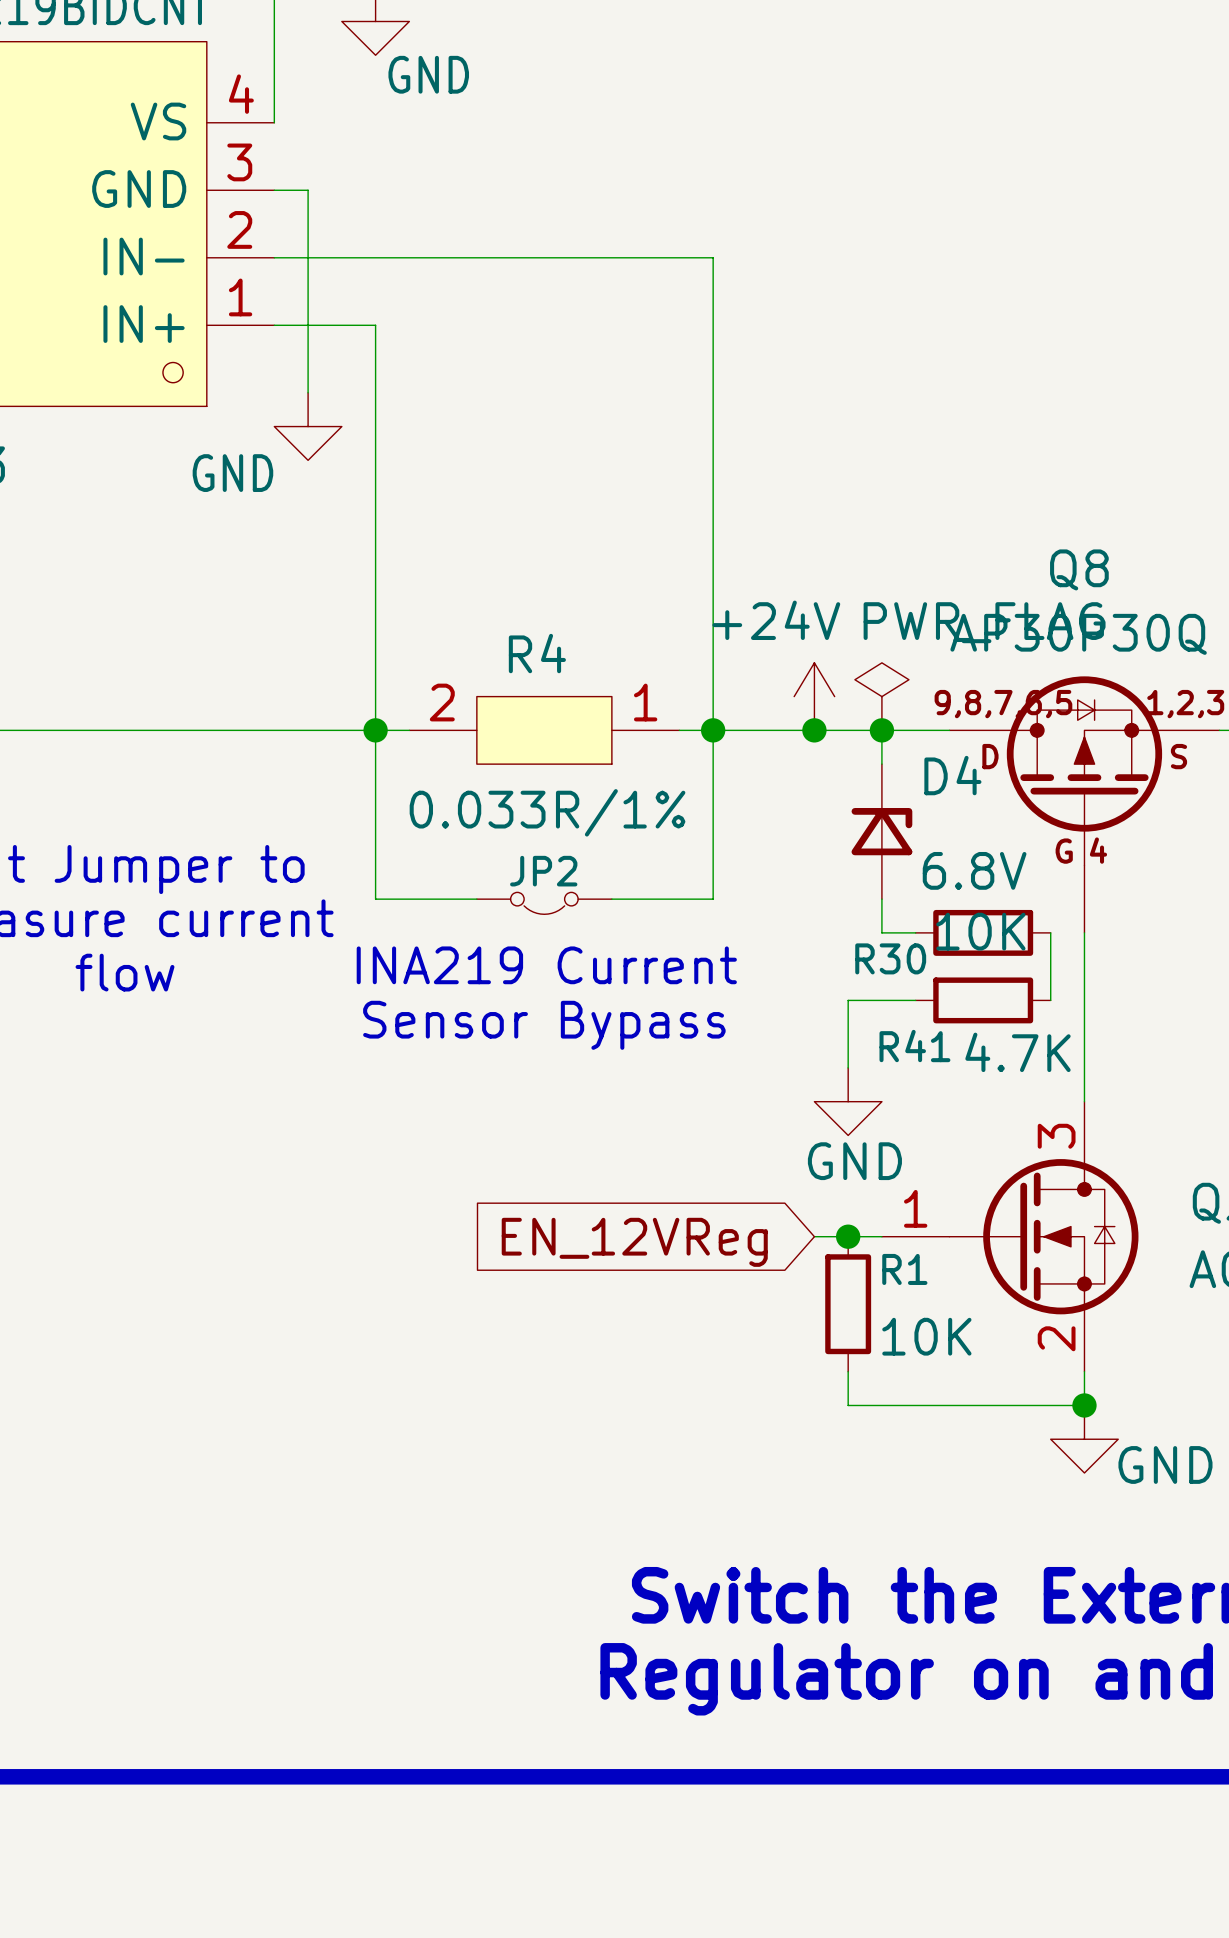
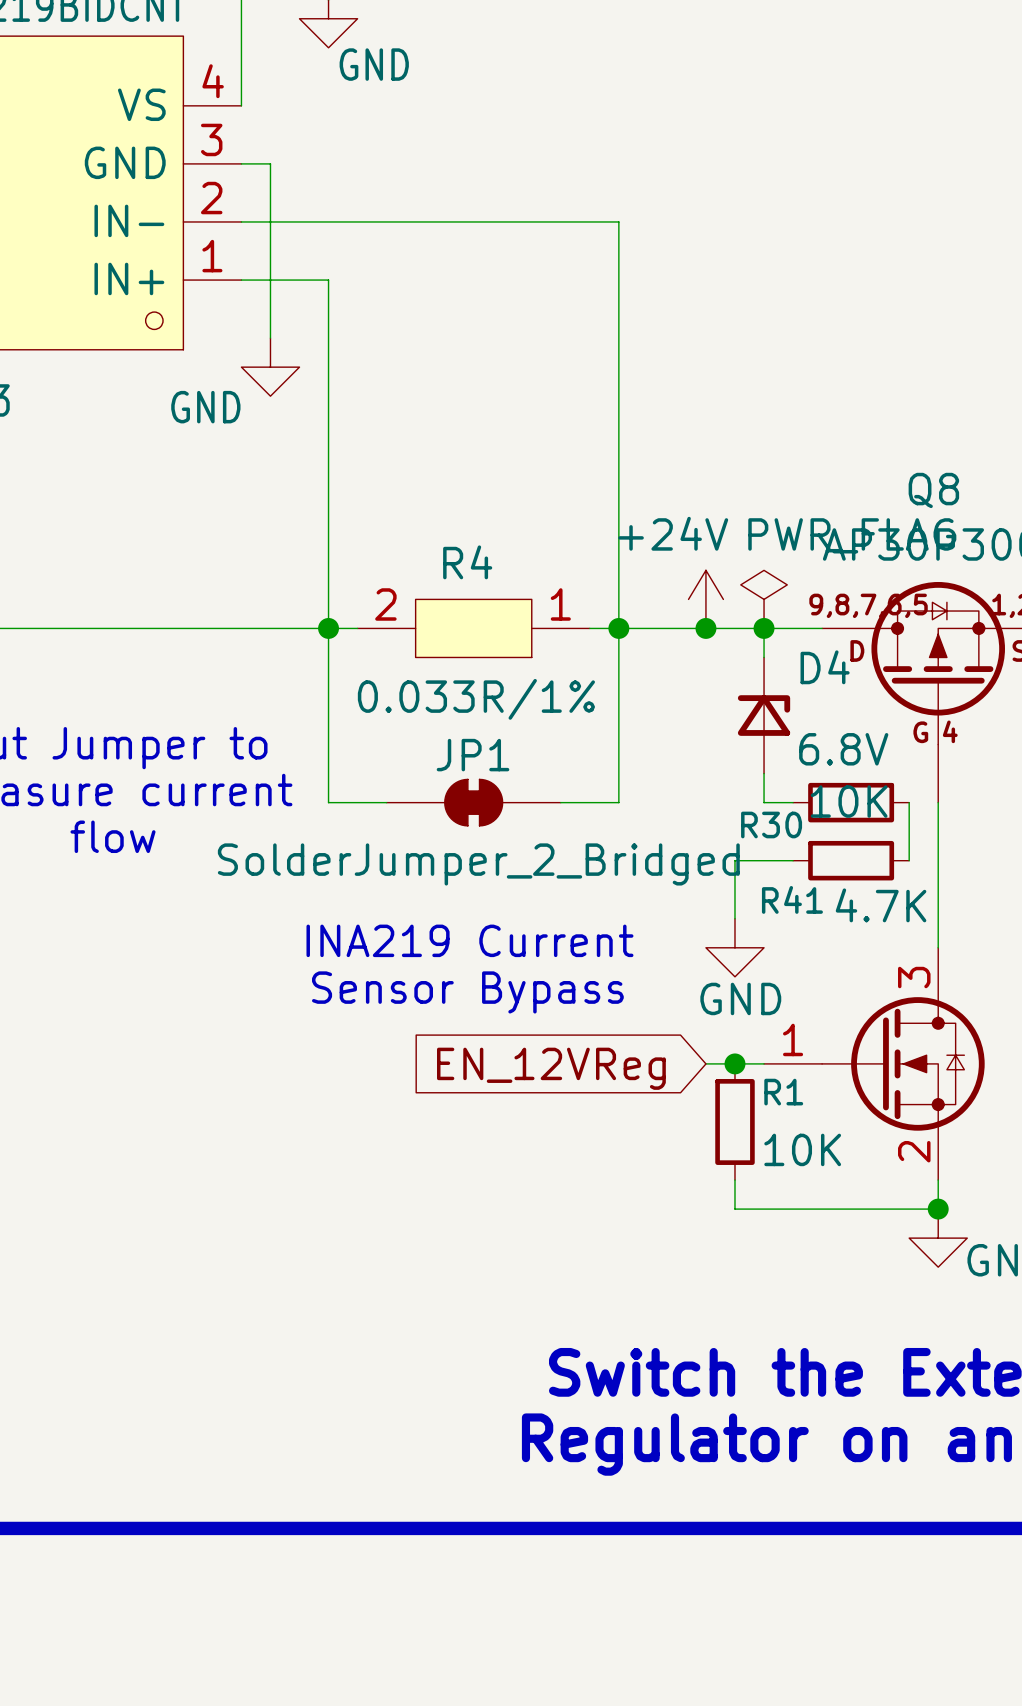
wire: (375, 899) (476, 899) -> (328, 773) (328, 802) (386, 802)
wire: (611, 899) (713, 899) -> (560, 802) (618, 802) (618, 773)
JP2: (544, 903) -> none
JP1: none -> SolderJumper_2_Bridged (473, 802)
text position: INA219 Current (546, 965) -> INA219 Current (469, 940)
text position: Sensor Bypass (544, 1025) -> Sensor Bypass (467, 992)

